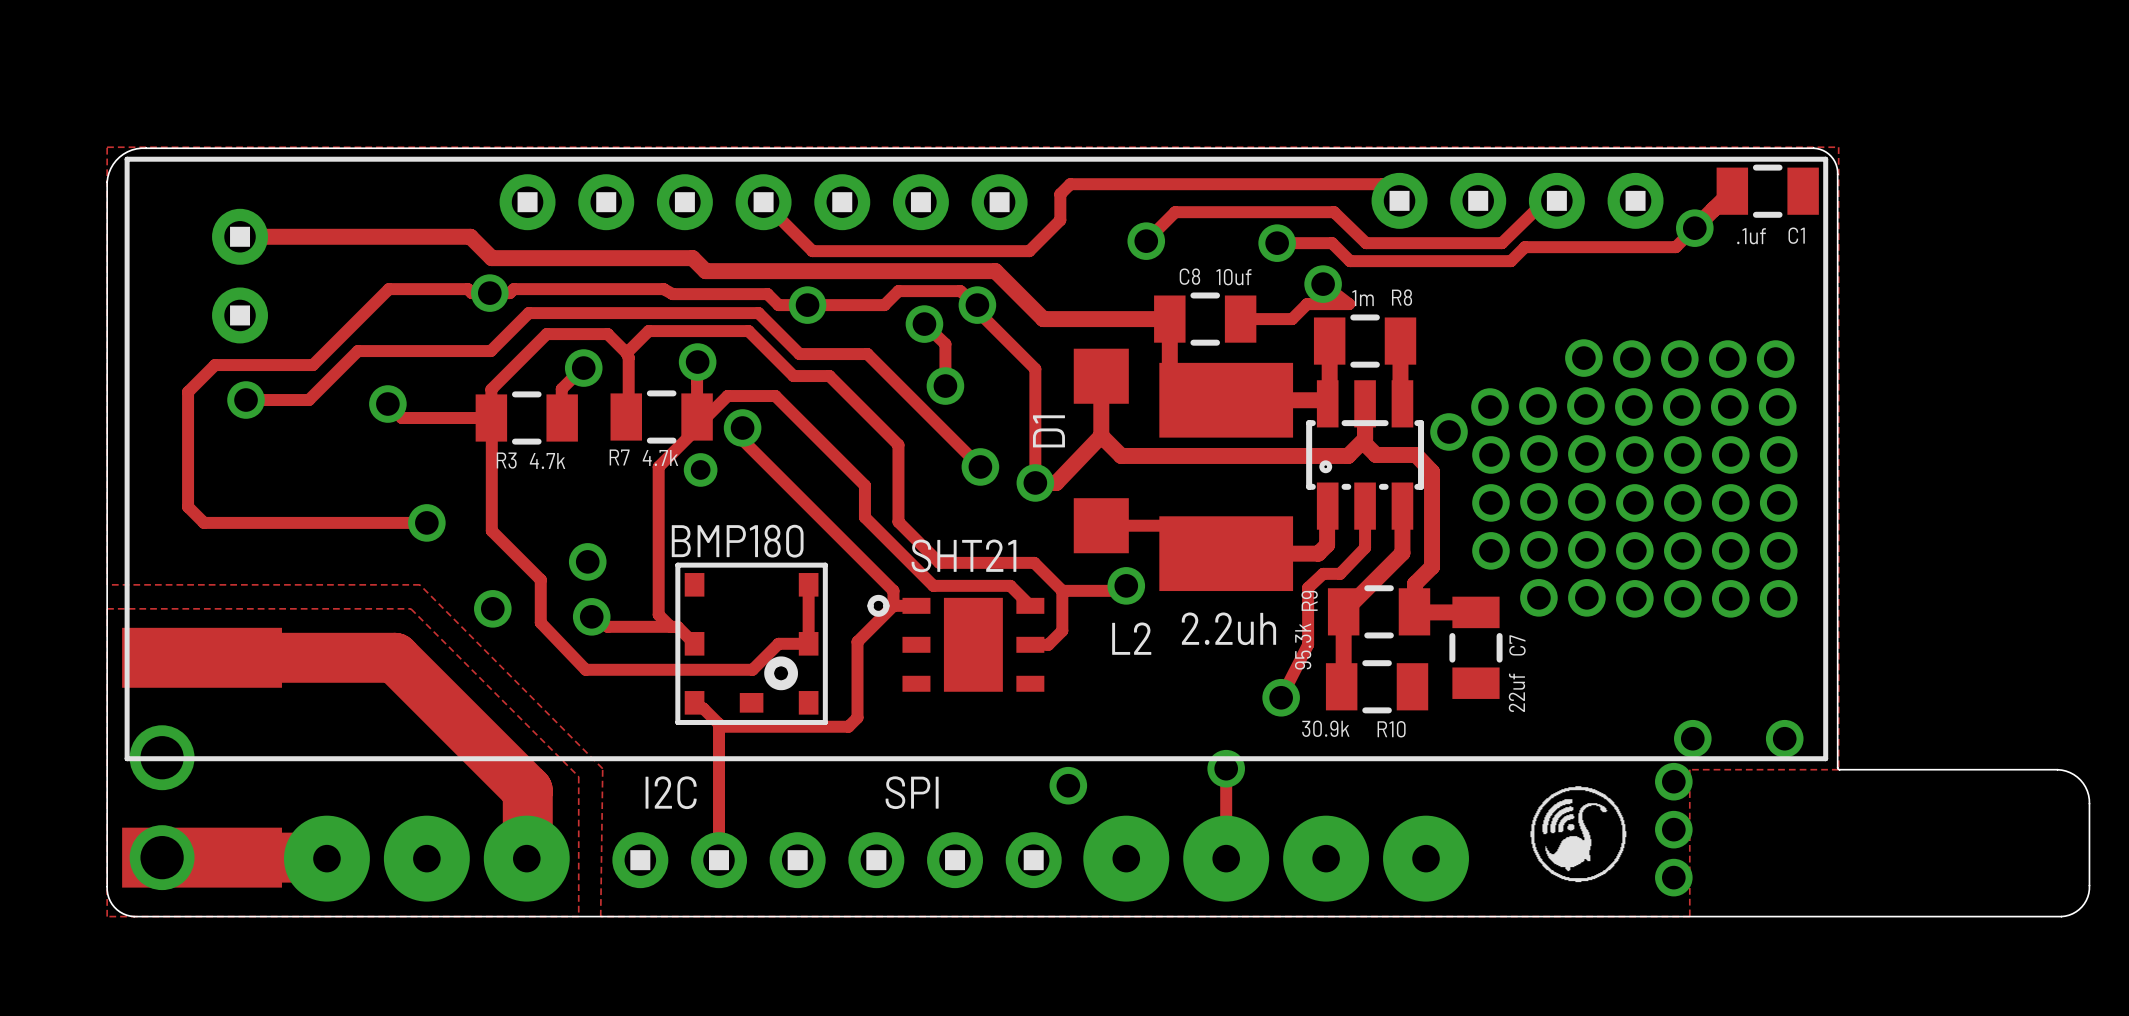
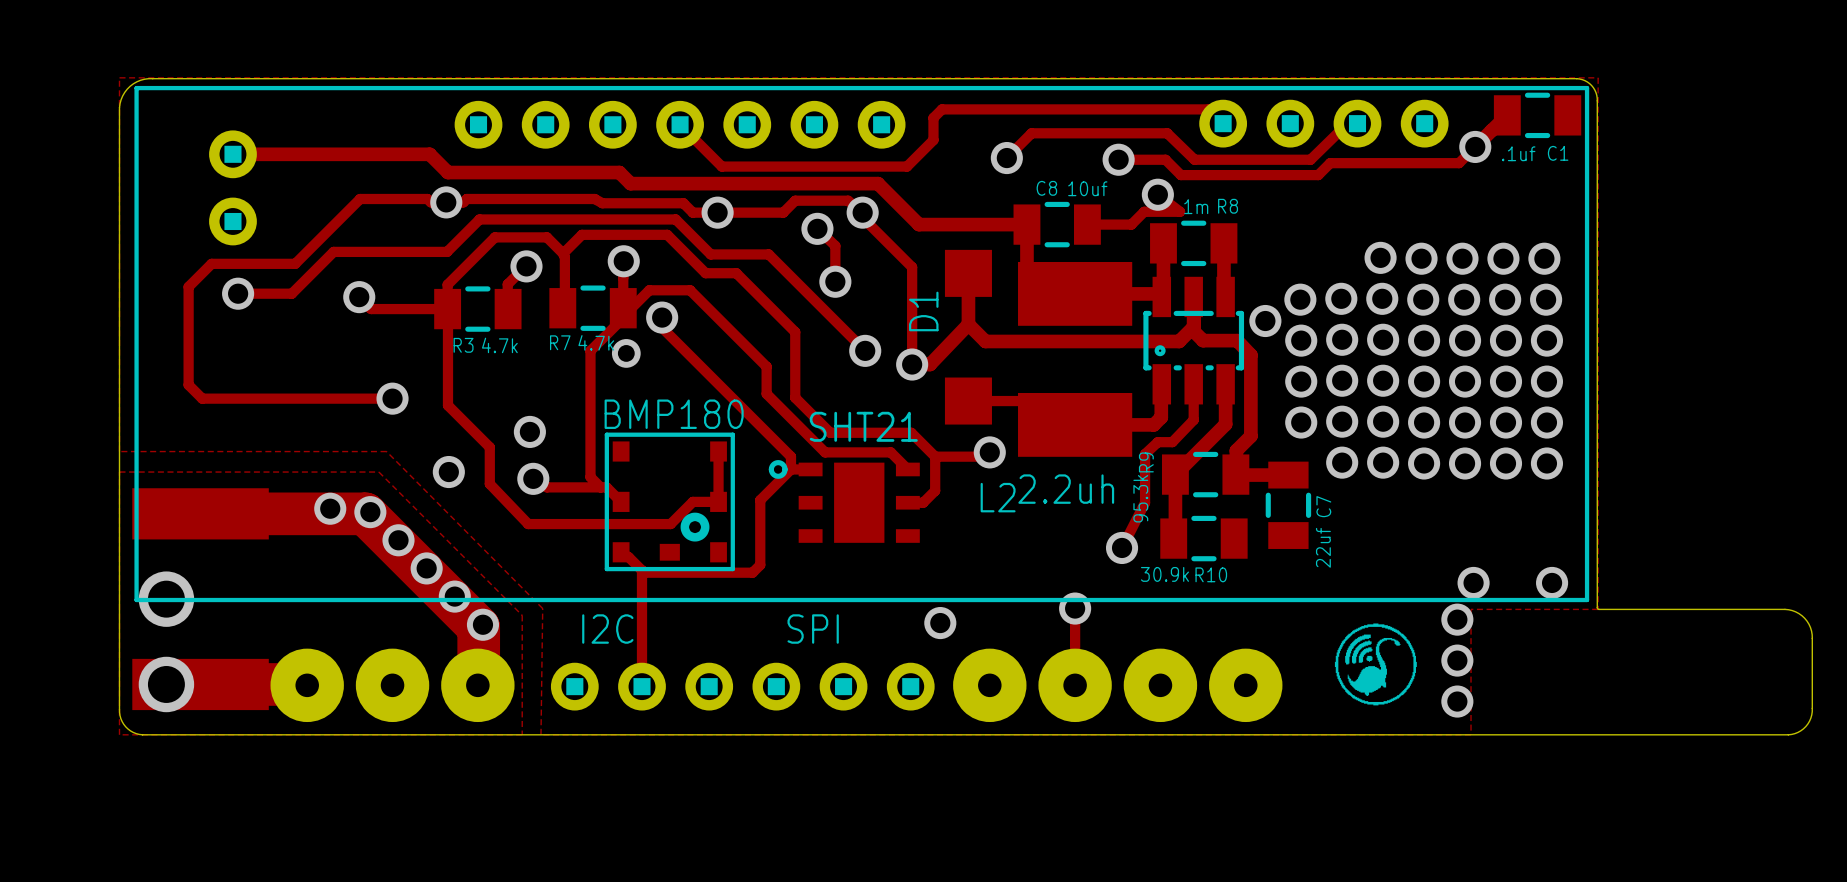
via: none -> (330, 508)
via: none -> (370, 512)
via: none -> (398, 540)
via: none -> (426, 568)
via: none -> (454, 596)
via: none -> (482, 624)

